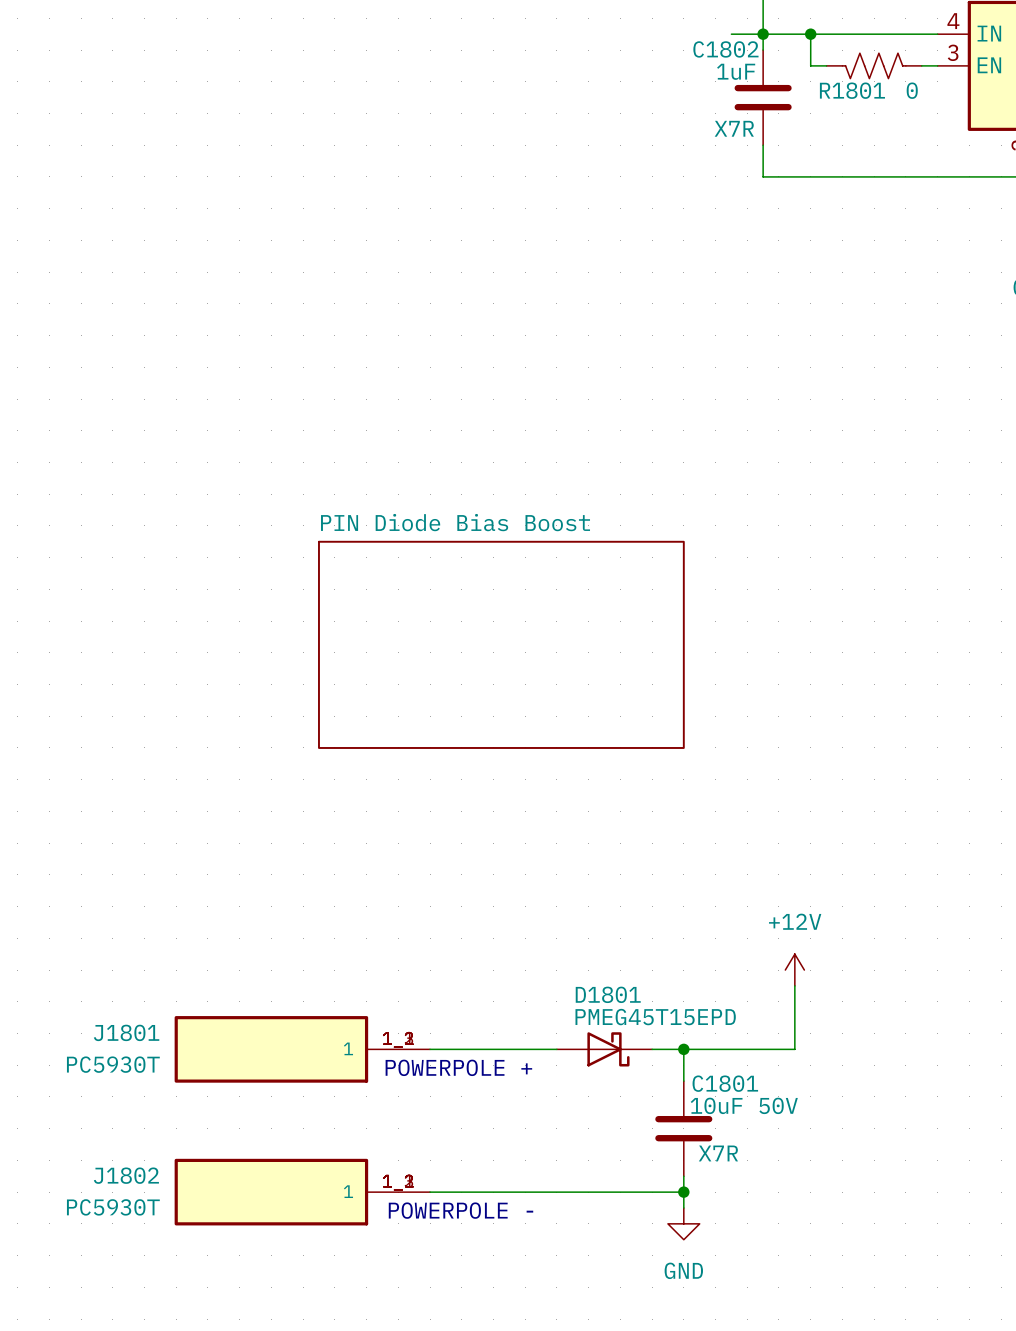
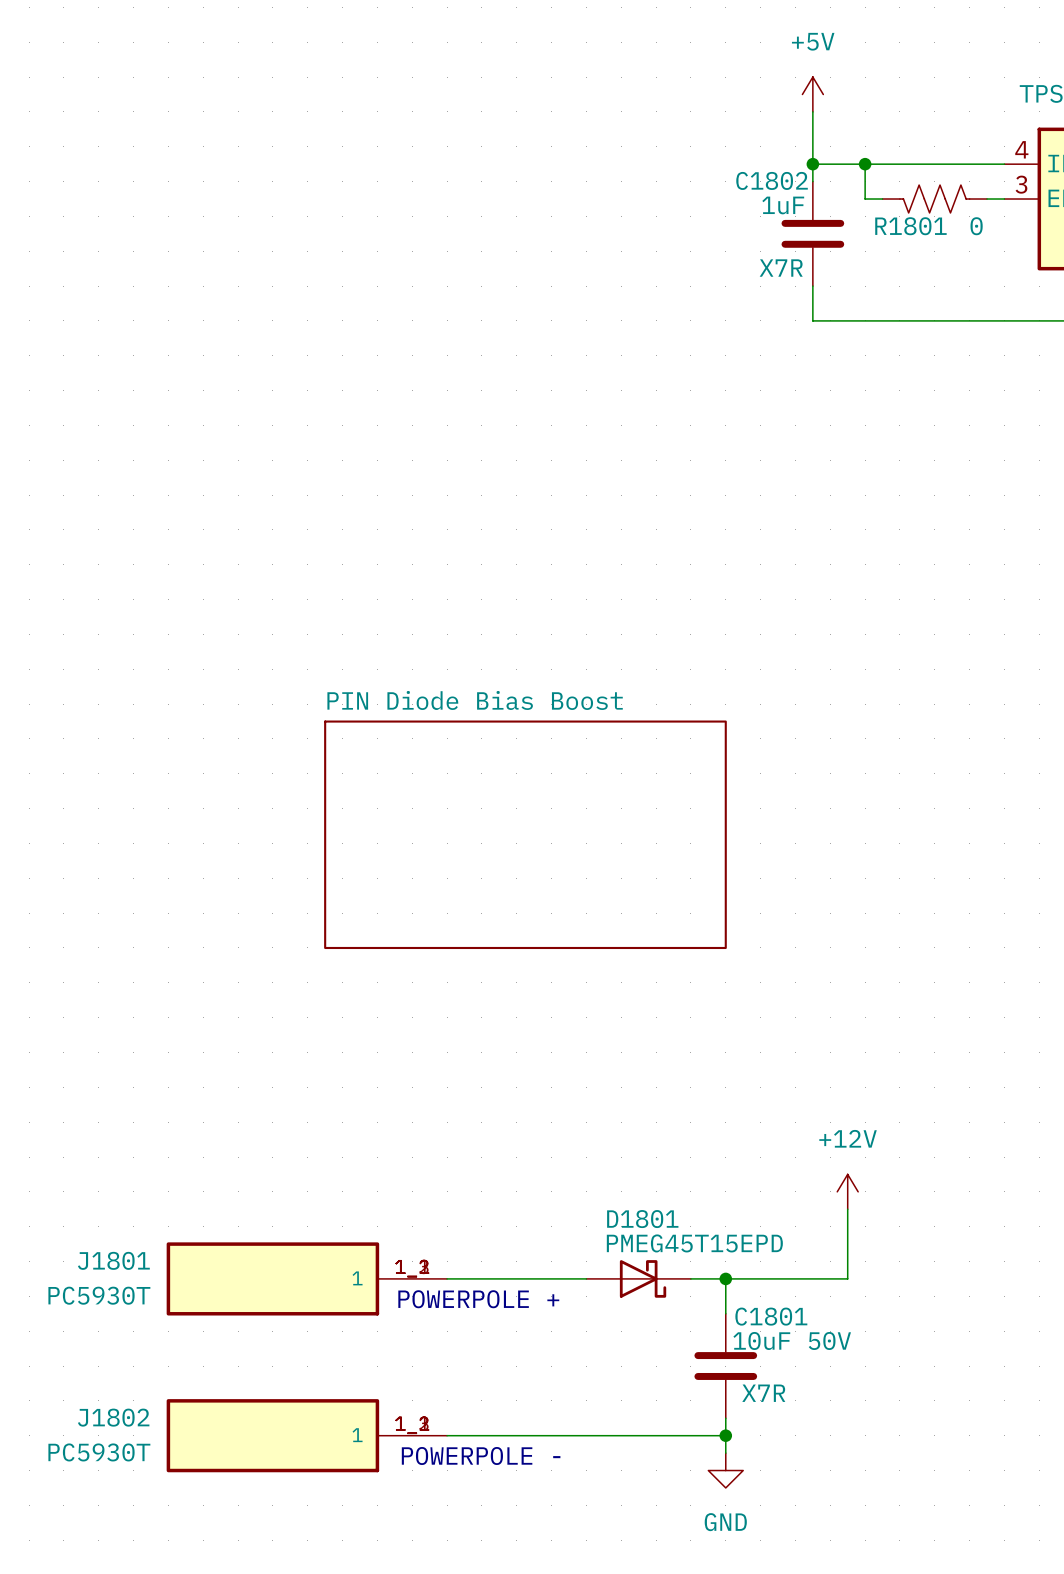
wire: (731, 34) (763, 34) -> none

